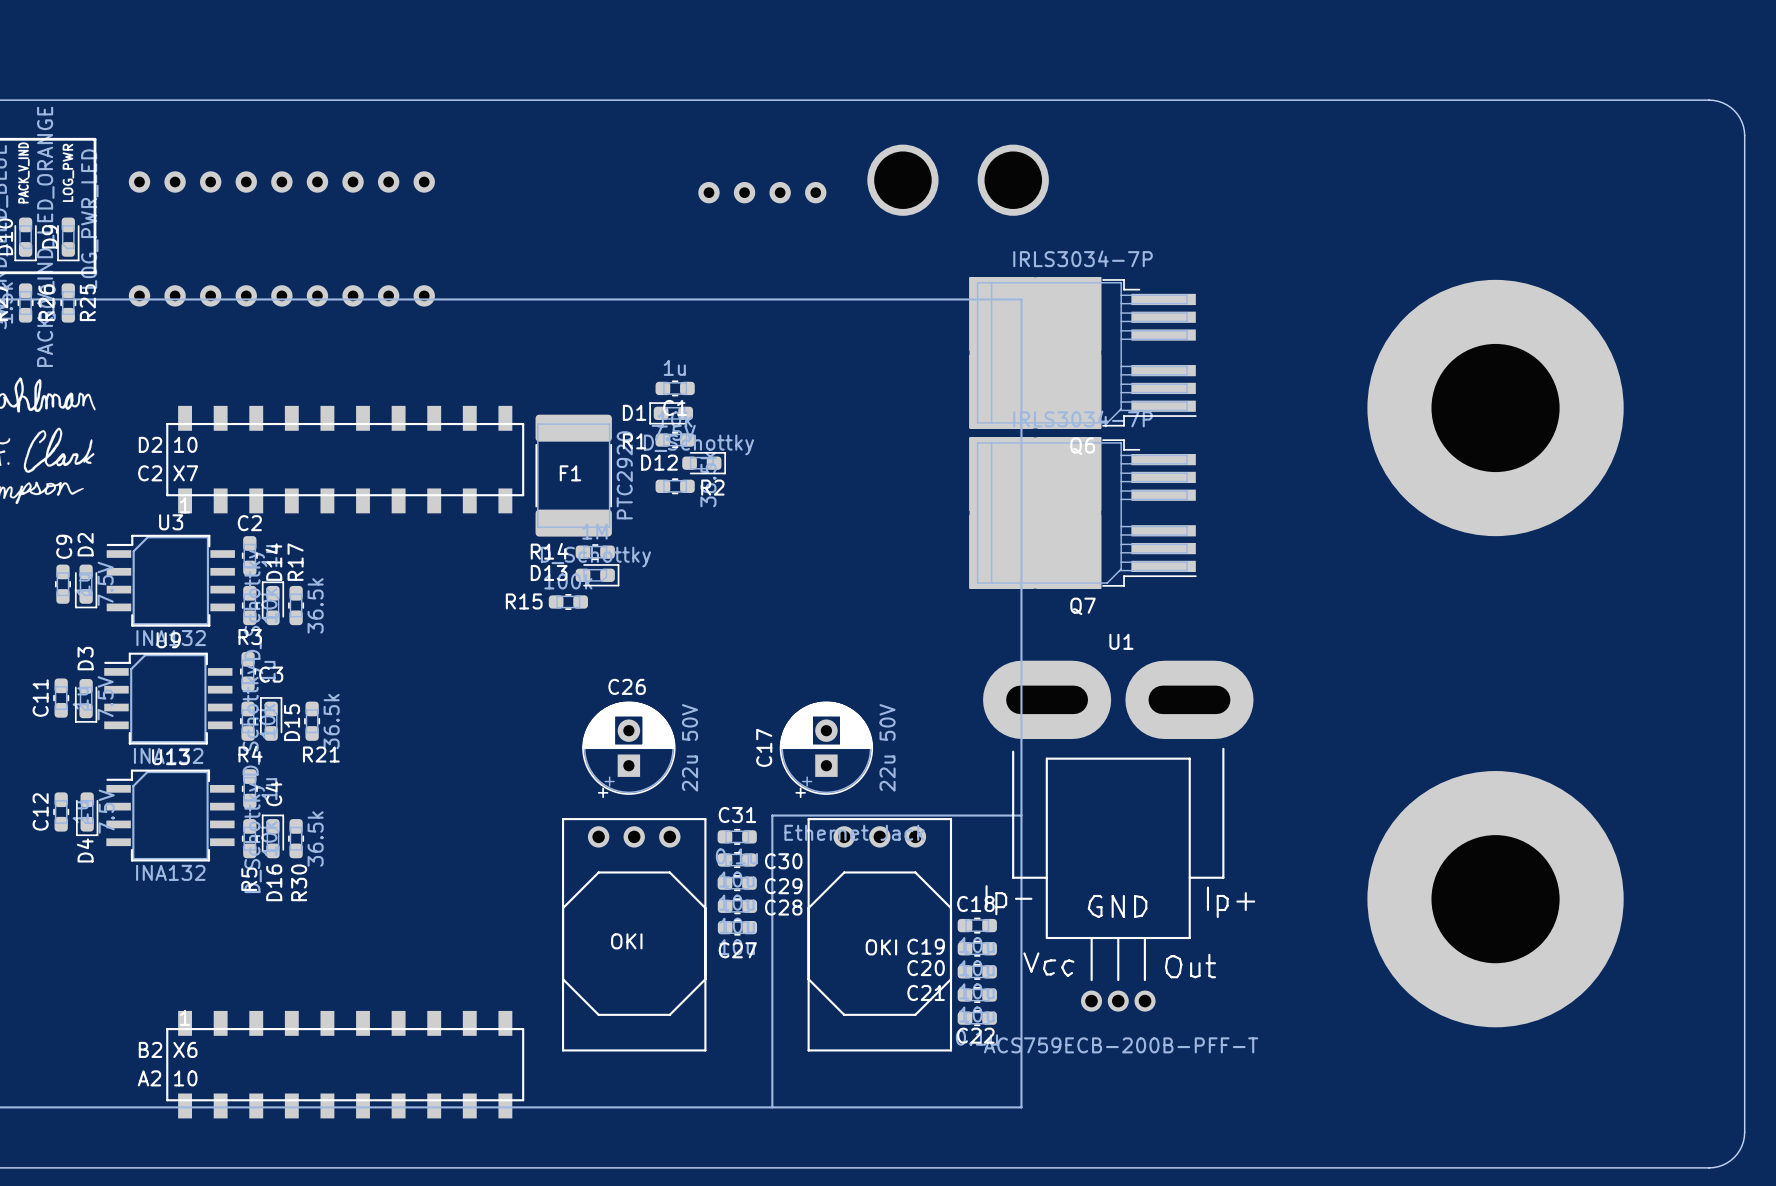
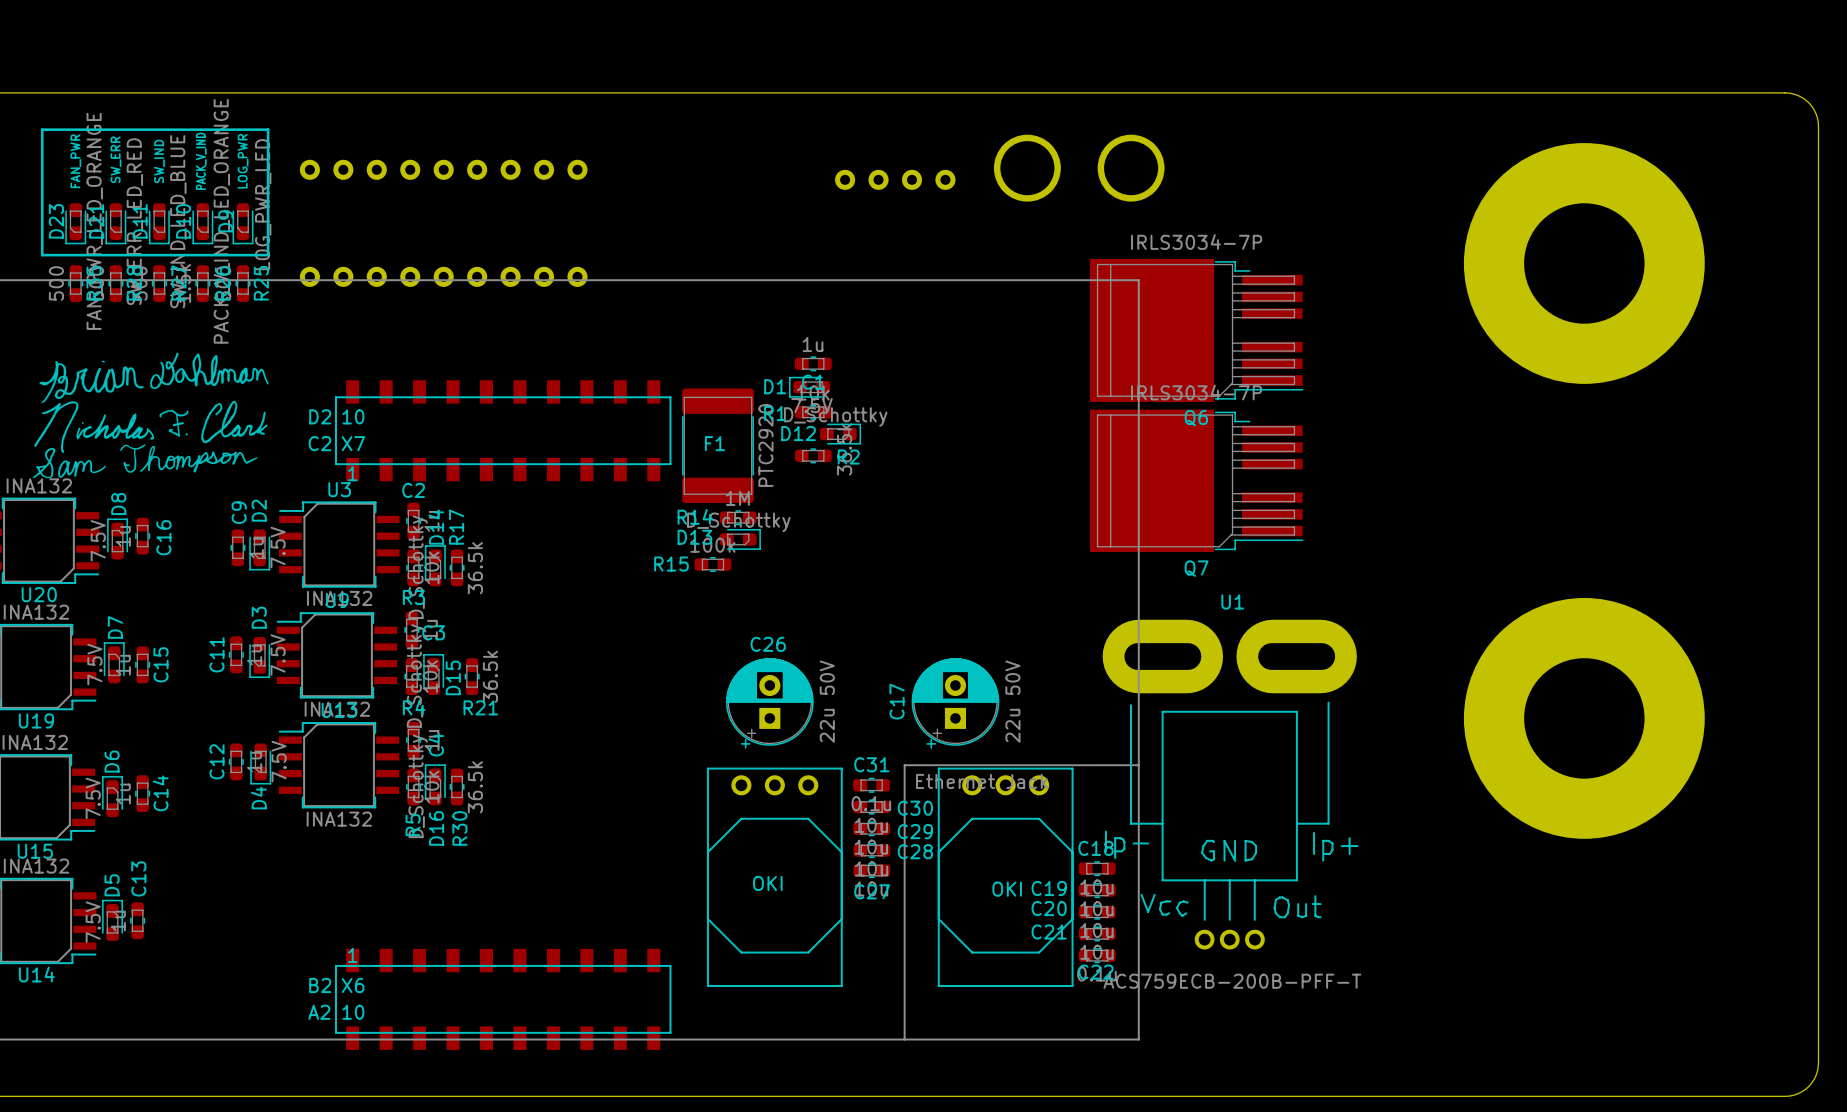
part position: (1495, 408) -> (1584, 263)
part position: (1495, 899) -> (1584, 718)

